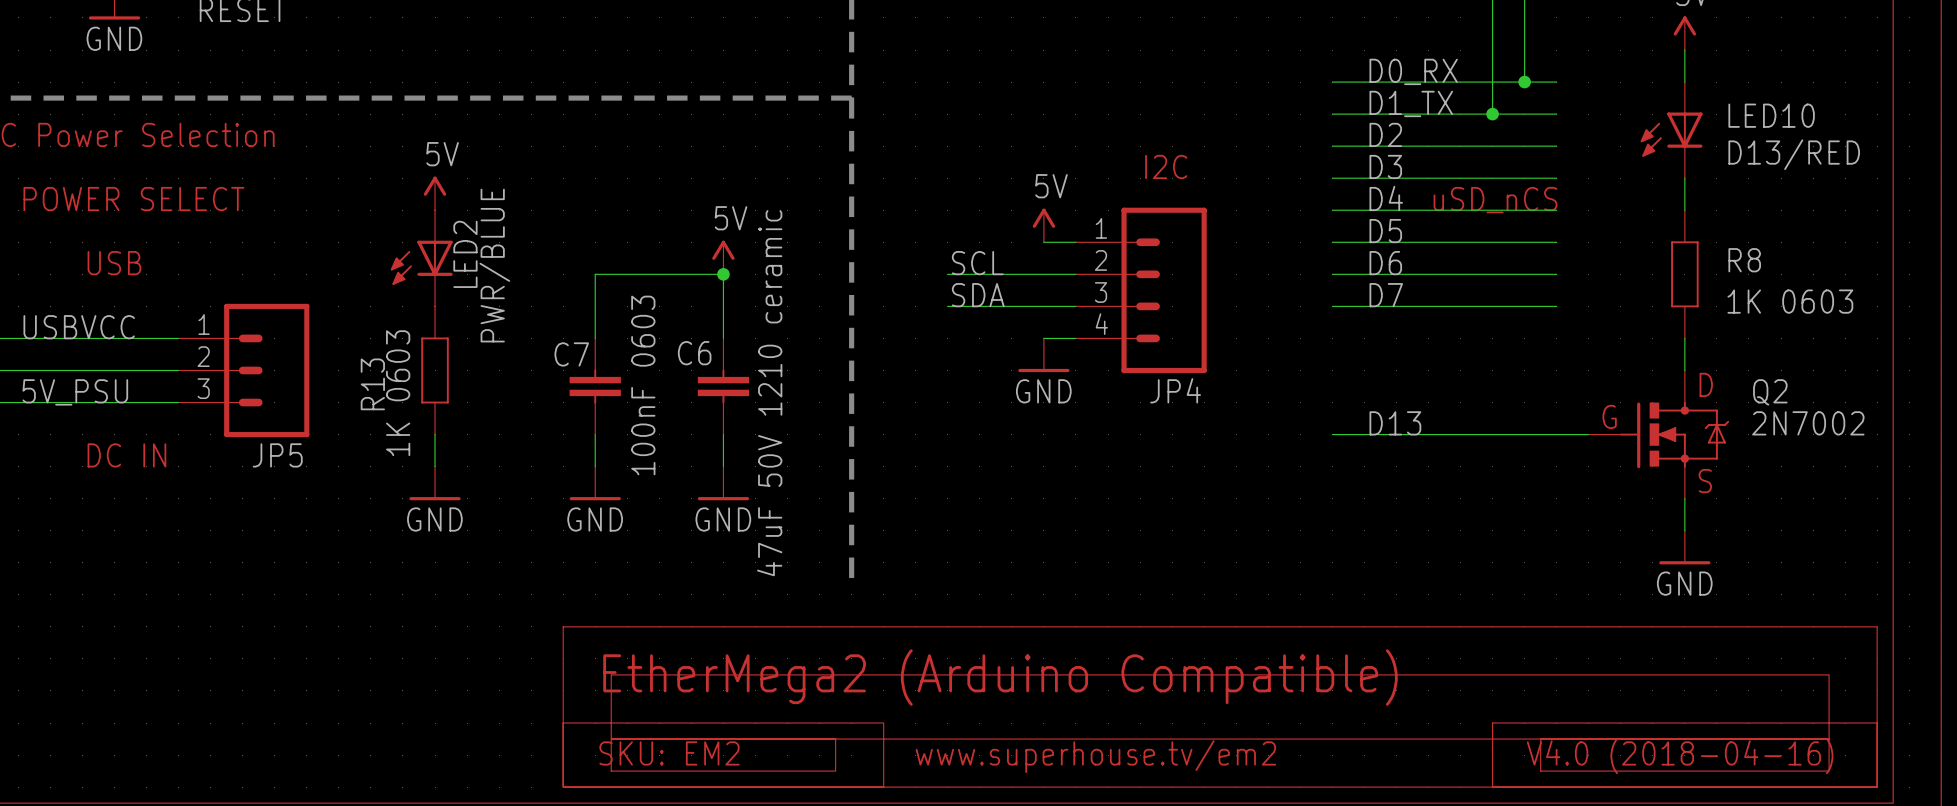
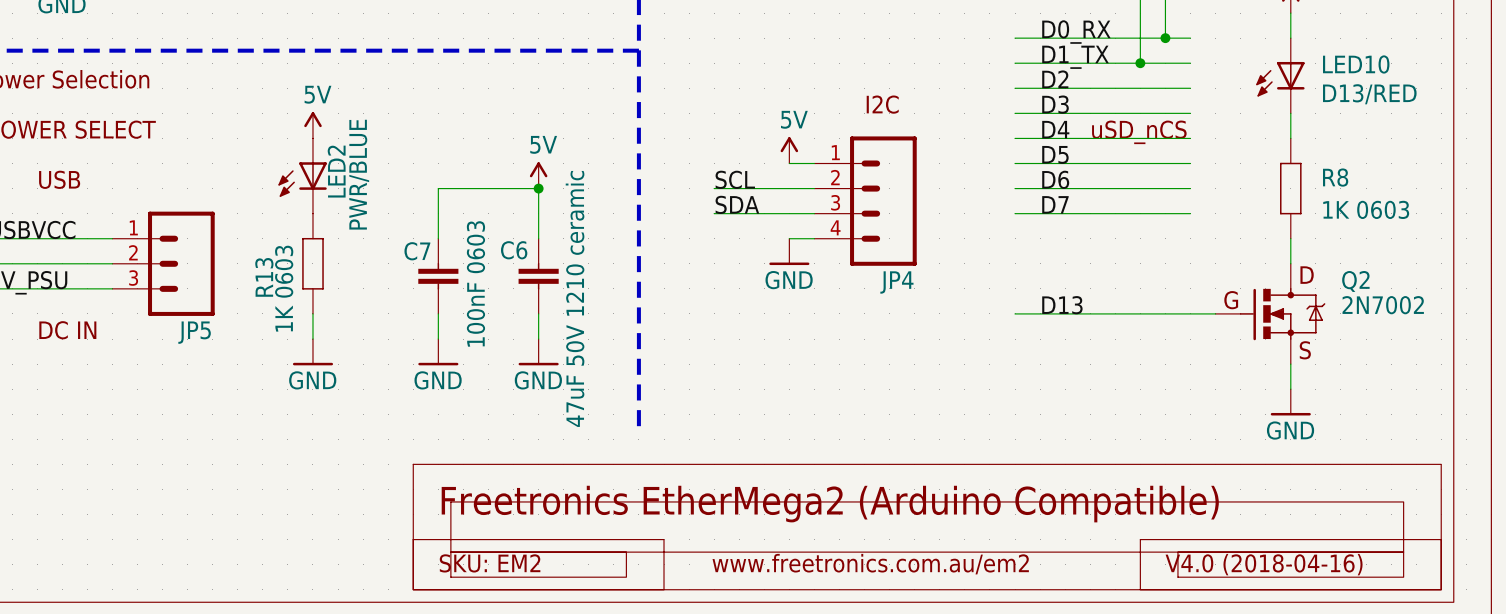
text: EtherMega2 (Arduino Compatible) (1000, 677) -> Freetronics EtherMega2 (Arduino Compatible) (830, 504)
text: none -> www.freetronics.com.au/em2 (870, 564)
text: www.superhouse.tv/em2 (1095, 756) -> none

